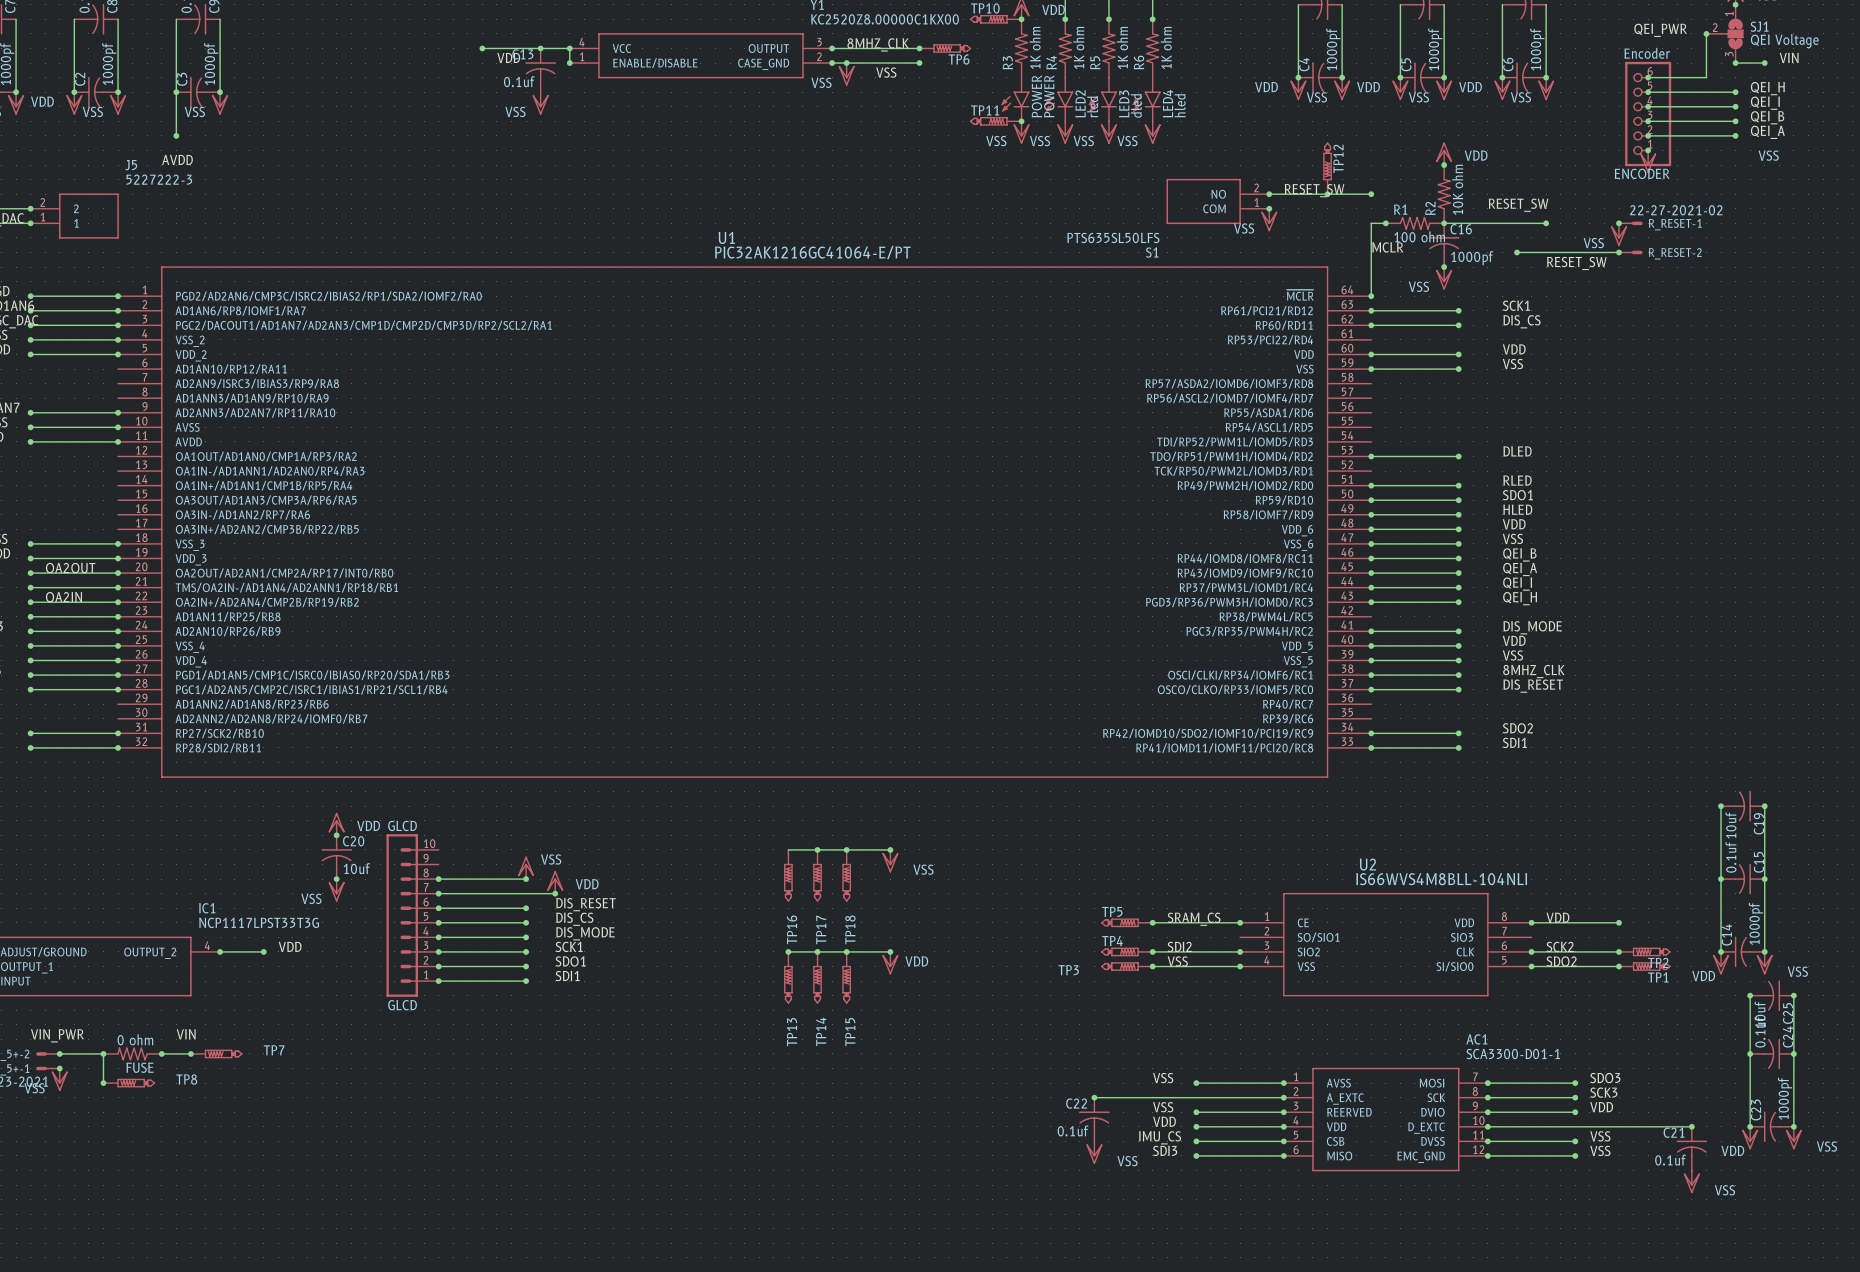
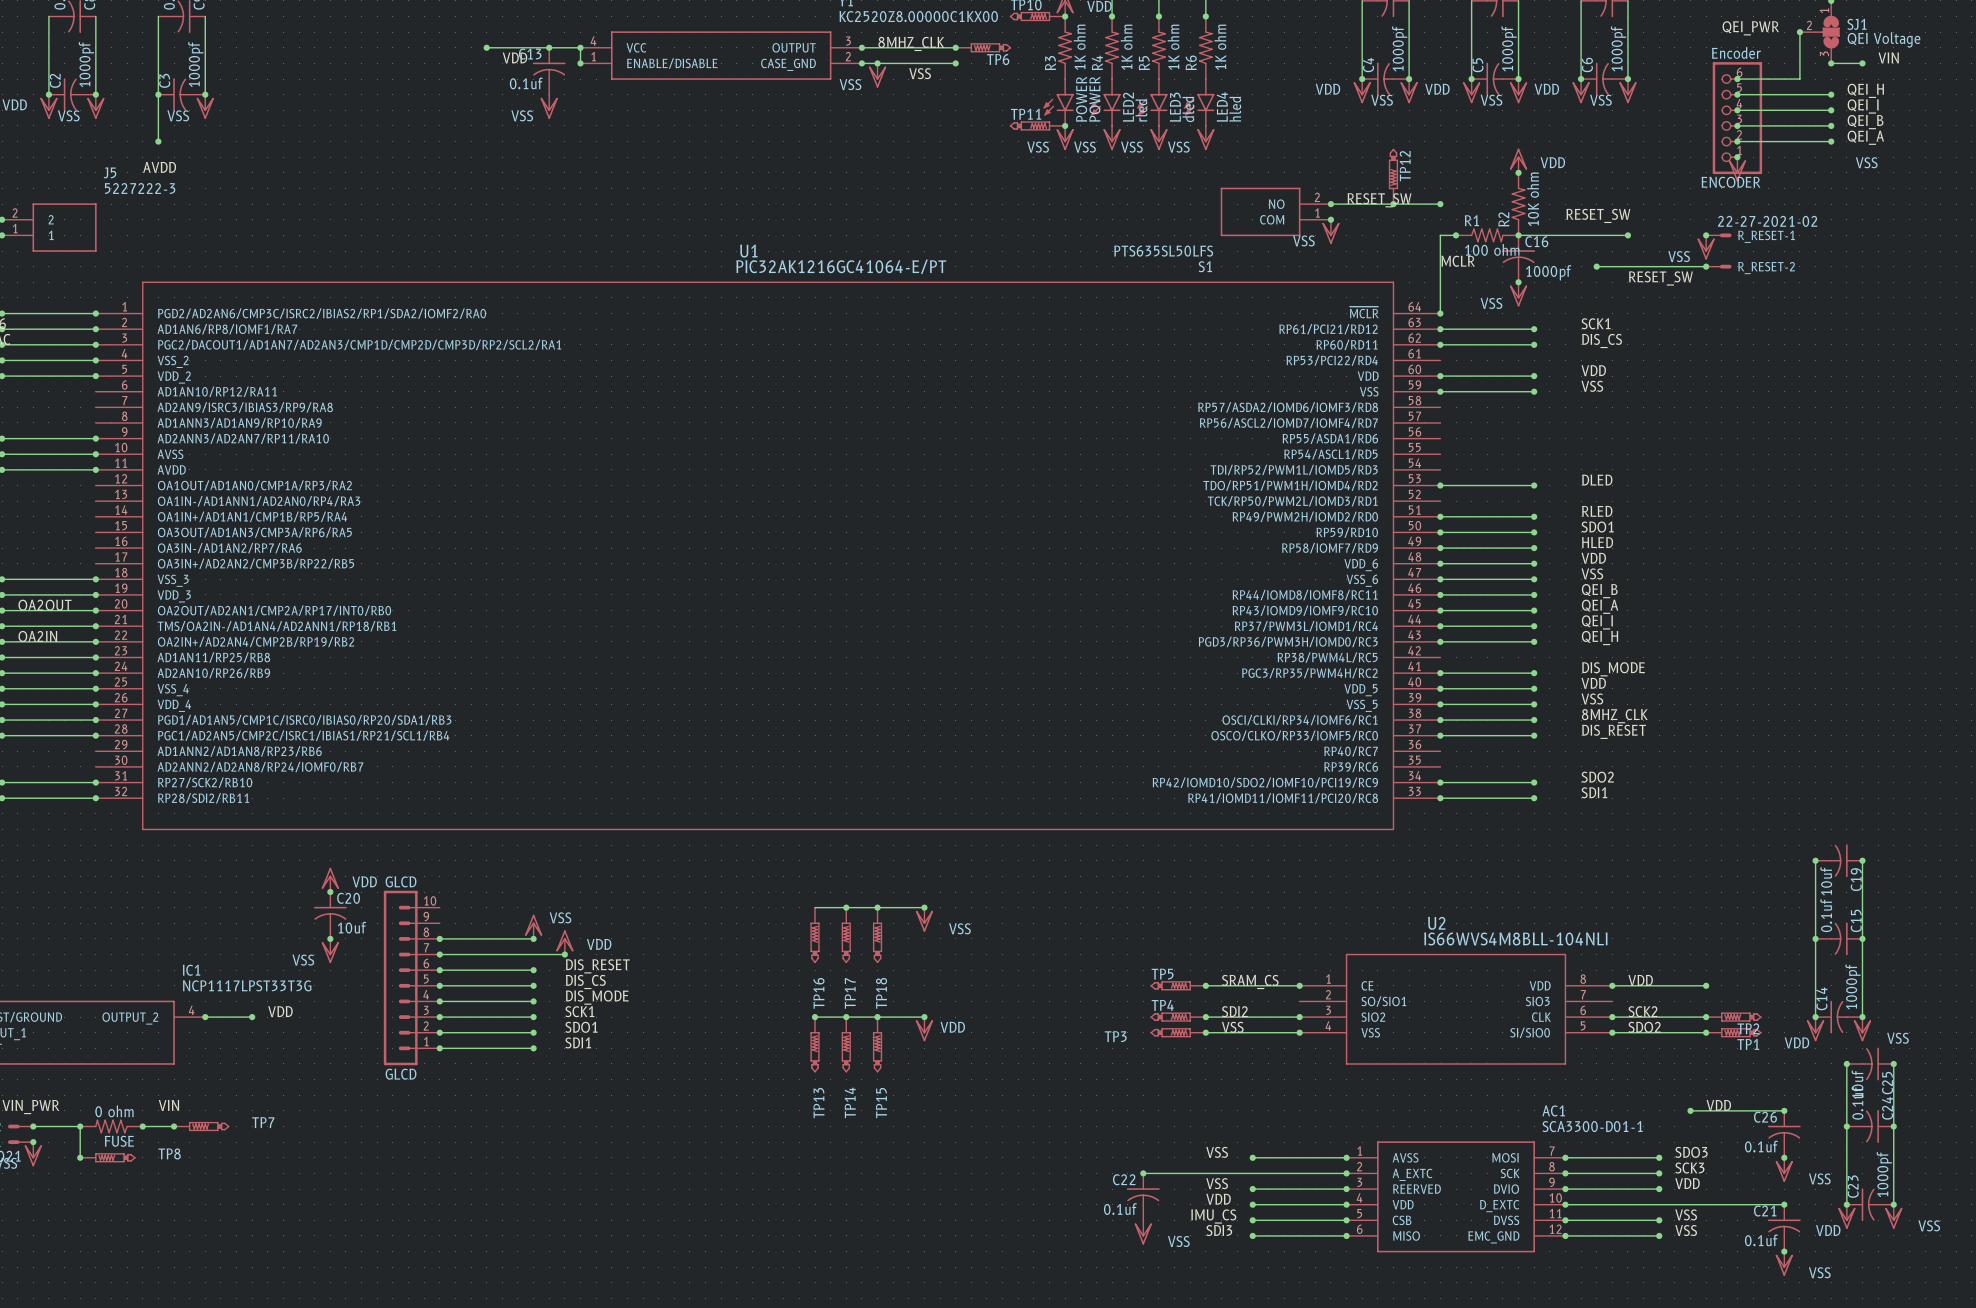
label: none -> VDD (1718, 1105)
wire: none -> (1690, 1110) (1784, 1110)
junction: none -> (1690, 1110)
junction: none -> (1784, 1110)
C26: none -> 0.1uf (1784, 1134)
junction: none -> (1784, 1157)
power symbol: none -> VSS (1784, 1169)
junction: none -> (1784, 1251)

